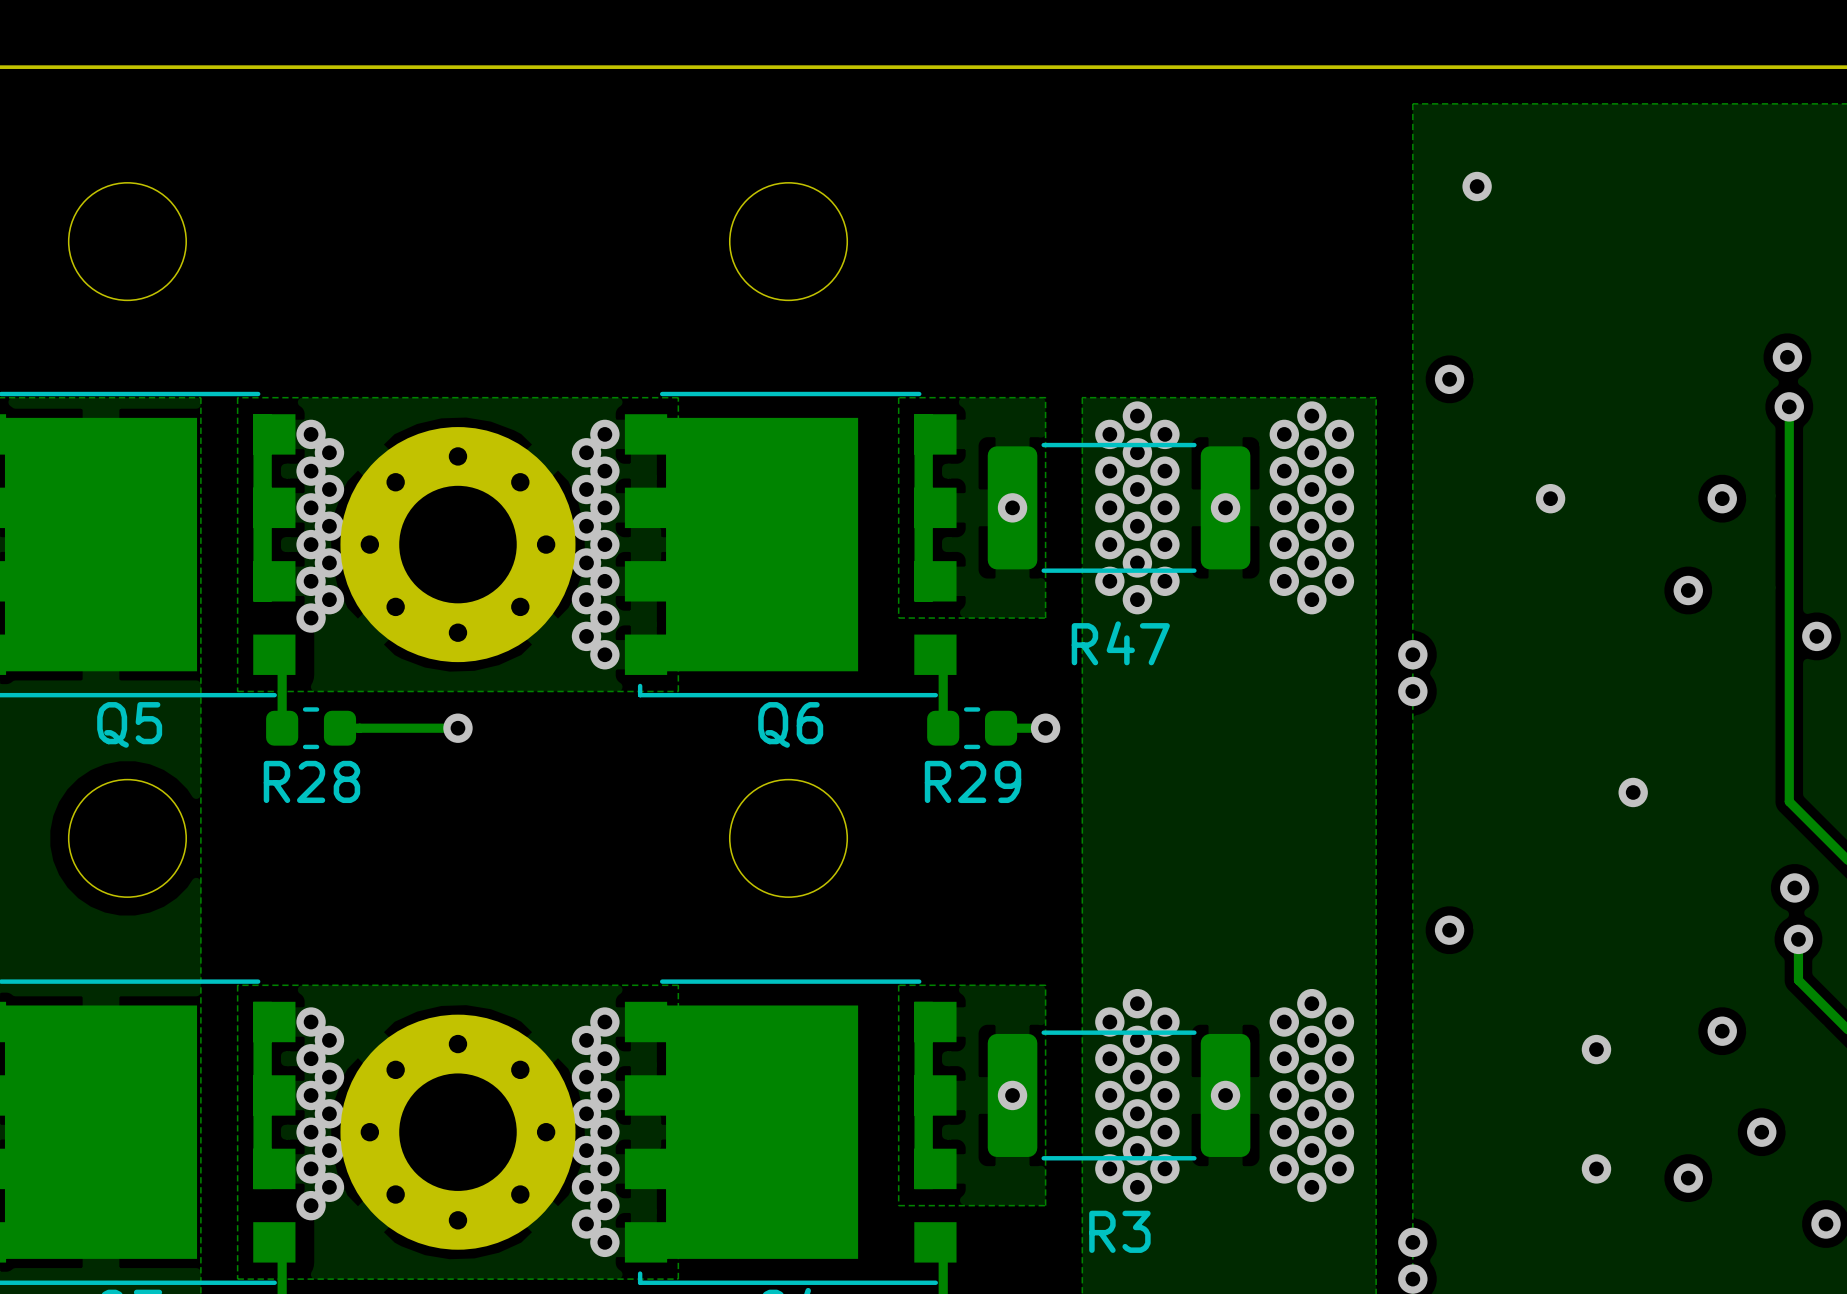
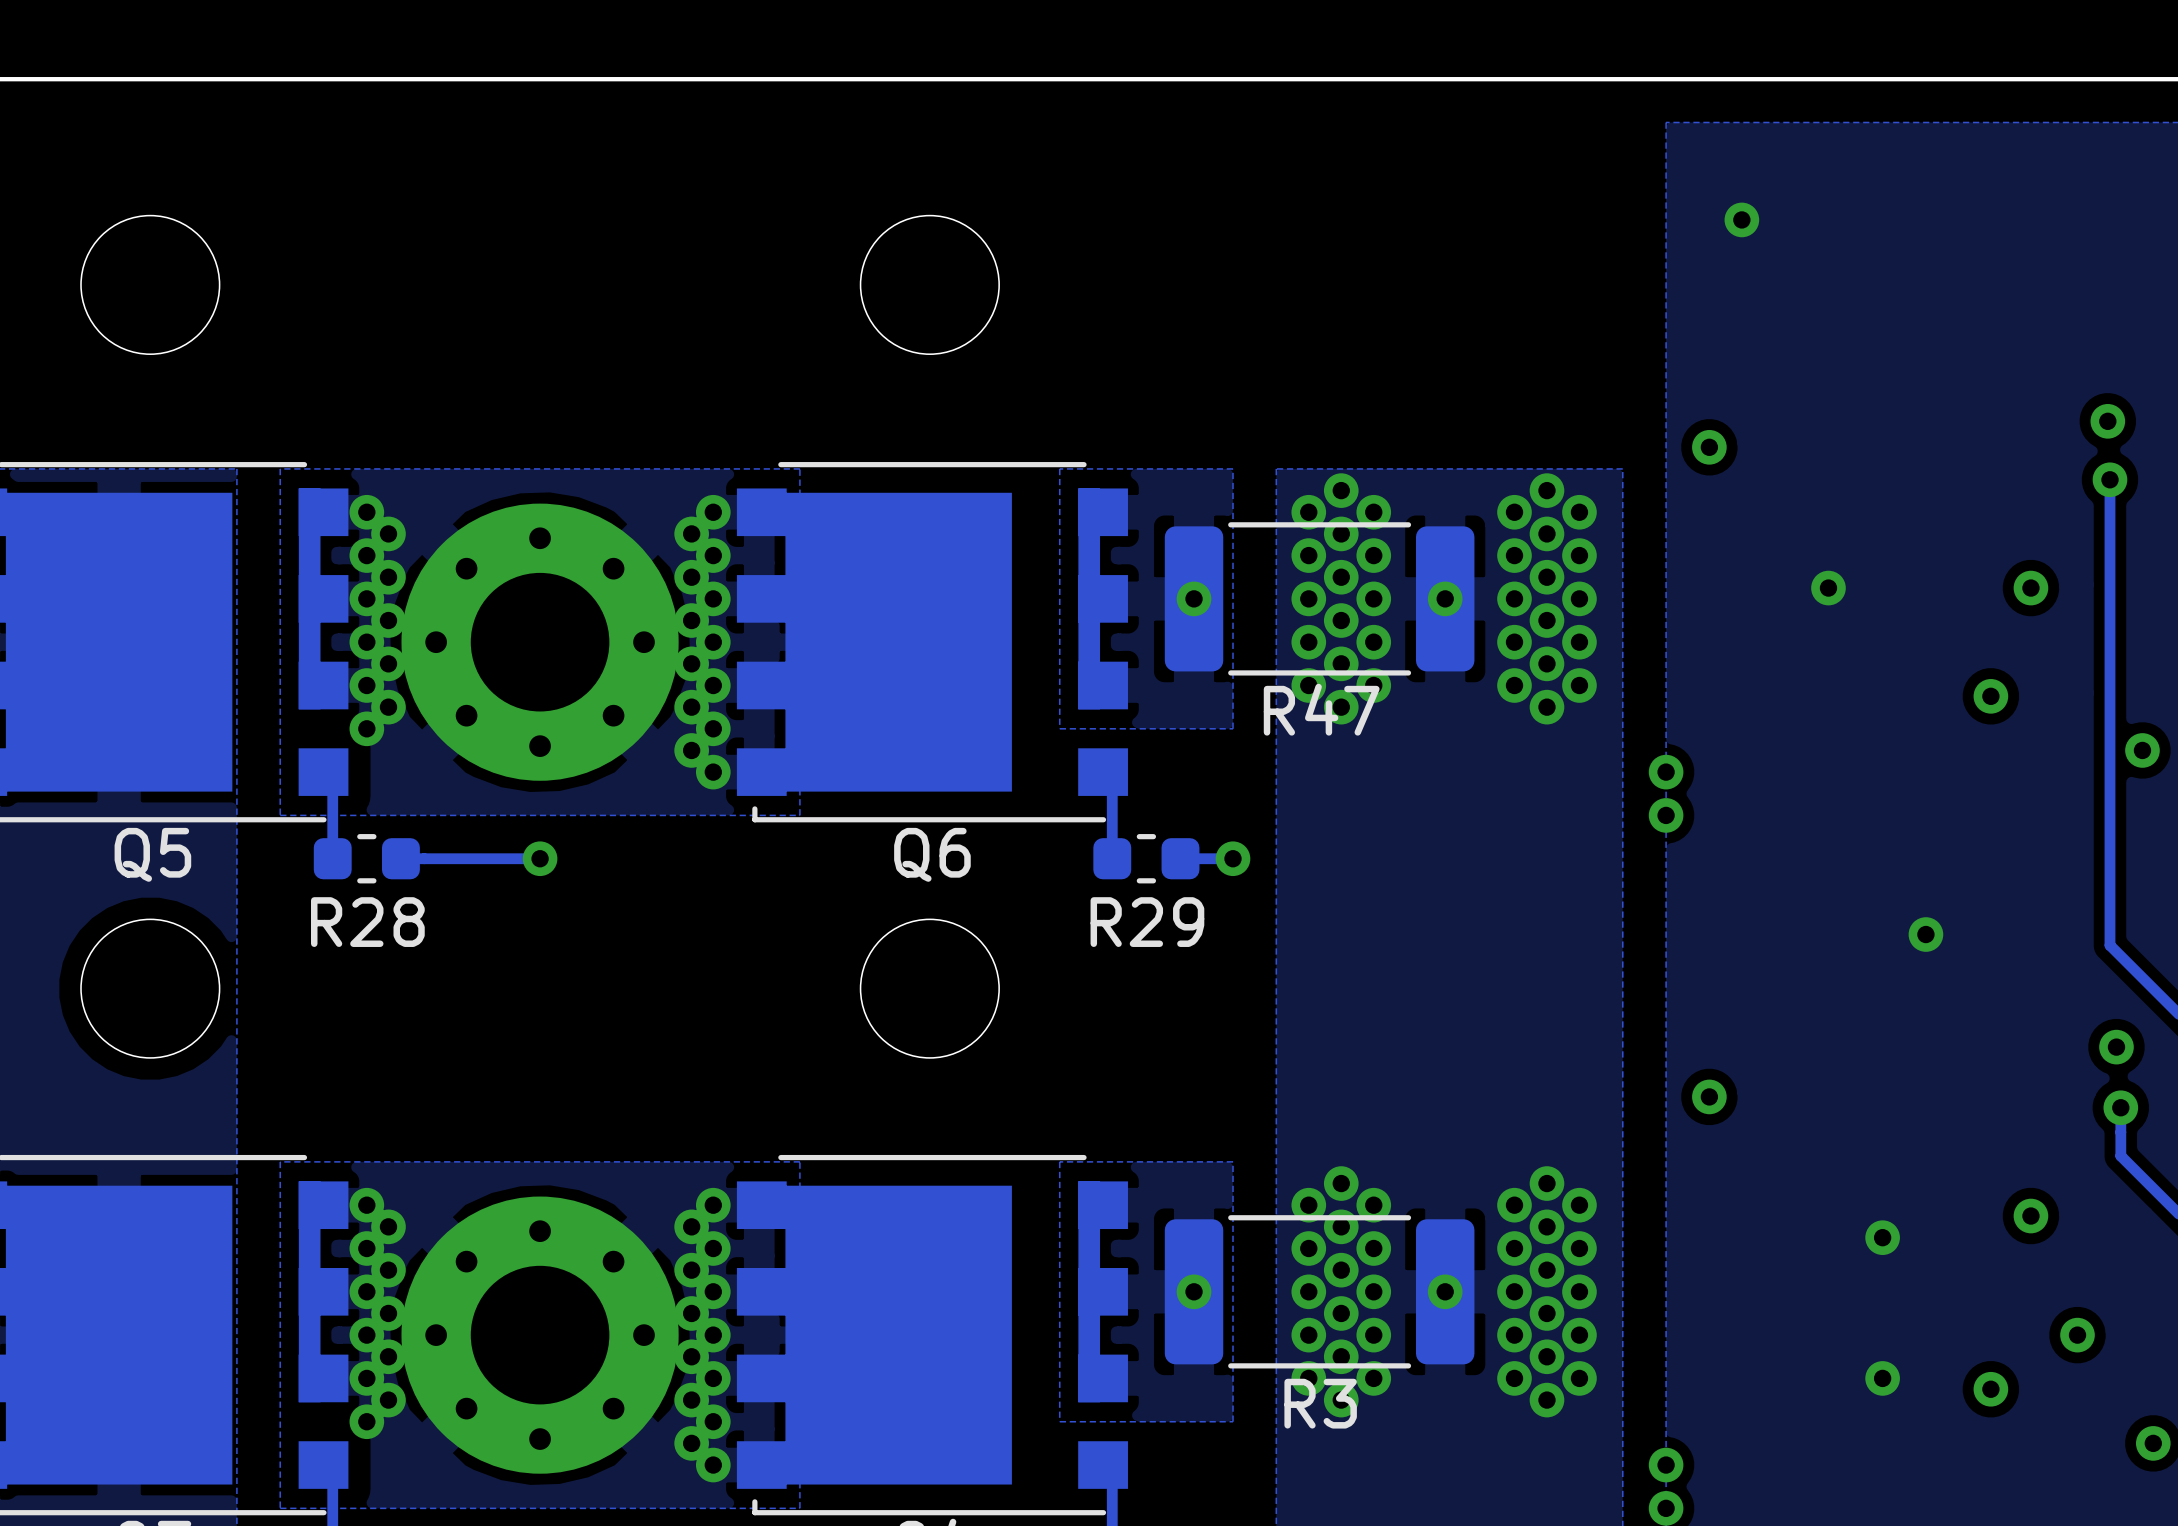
R47 name position: R47 (1120, 643) -> R47 (1321, 709)
R3 name position: R3 (1119, 1231) -> R3 (1320, 1403)

